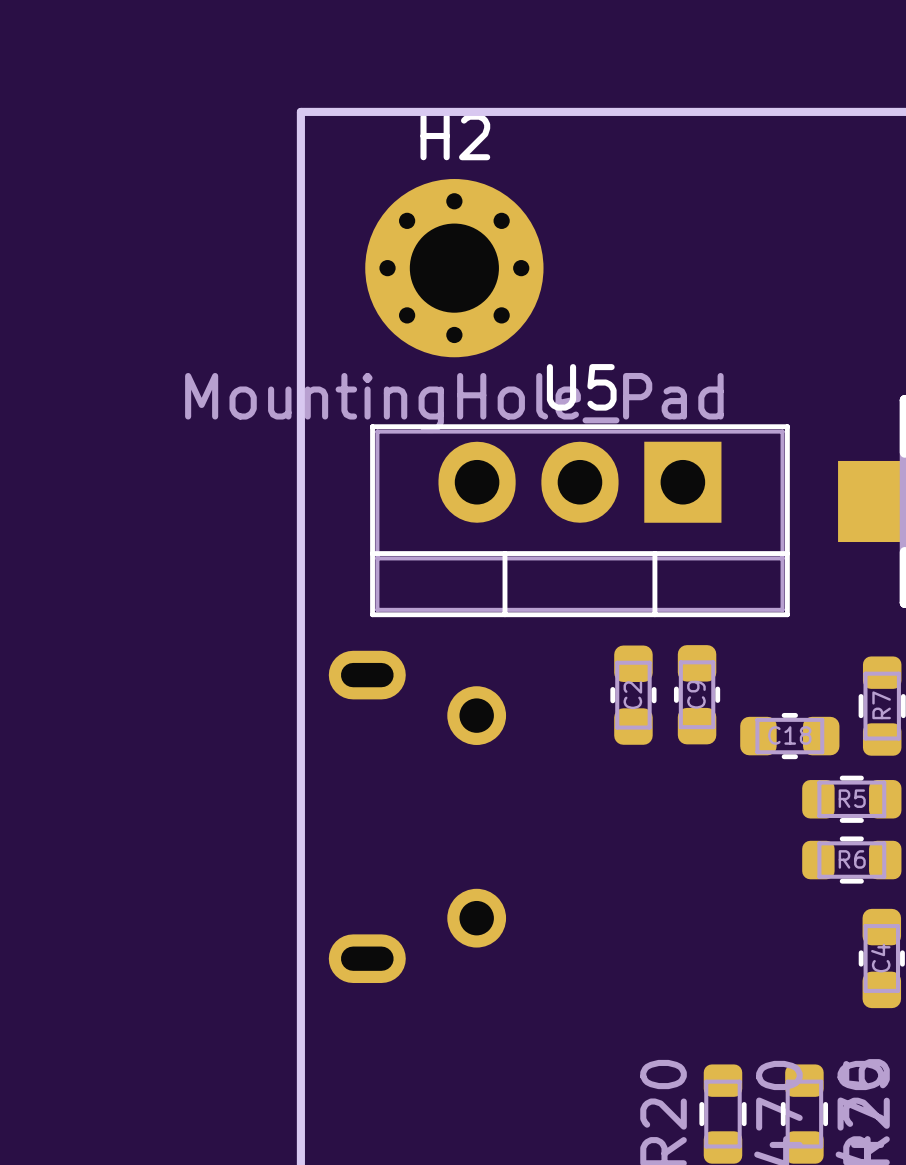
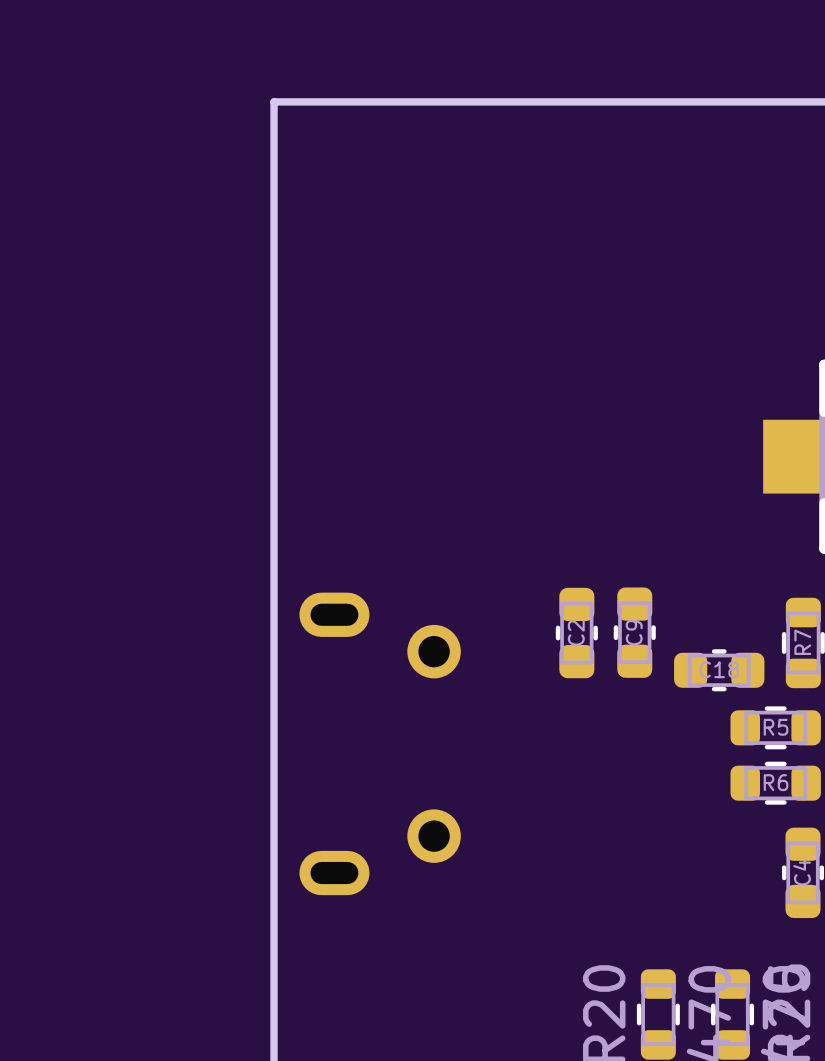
H2: MountingHole_Pad (454, 268) -> none
U5: (579, 520) -> none

